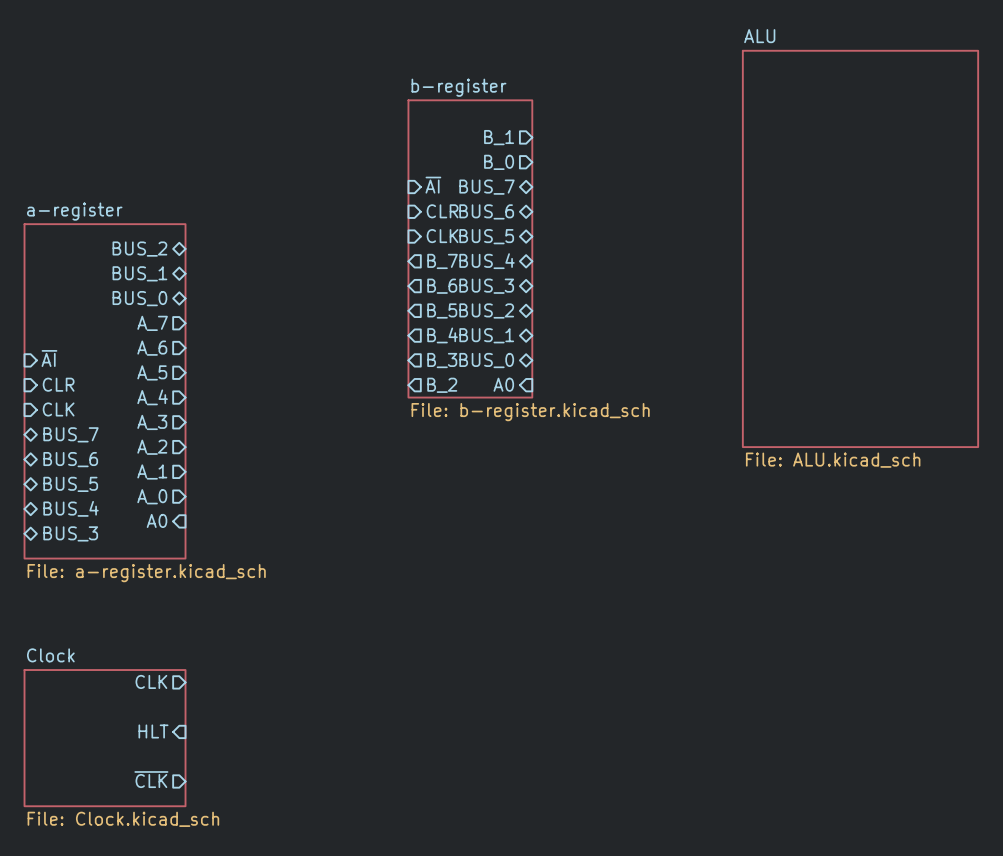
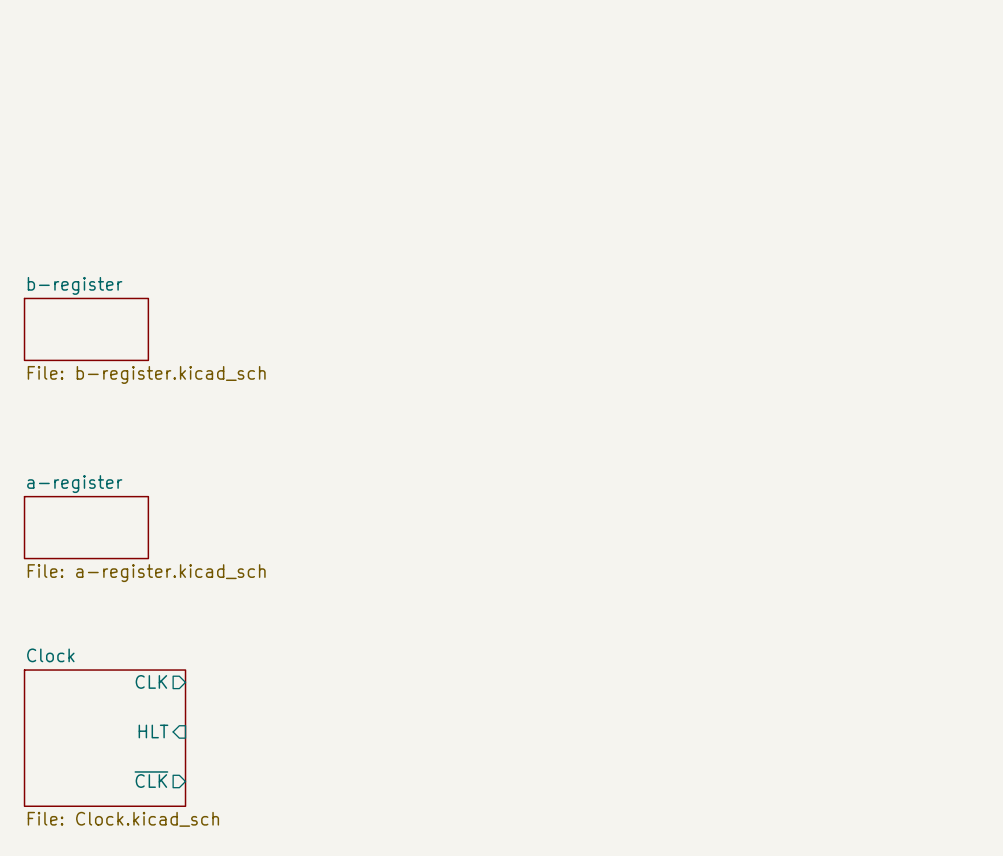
sheet pin: B_1 (499, 137) -> none
sheet pin: B_0 (499, 162) -> none
sheet pin: ~{AI} (433, 185) -> none
sheet pin: BUS_7 (486, 187) -> none
sheet pin: CLR (442, 211) -> none
sheet pin: BUS_6 (486, 211) -> none
sheet pin: CLK (442, 236) -> none
sheet pin: BUS_5 (486, 236) -> none
sheet b-register: File: b-register.kicad_sch (470, 248) -> none
sheet ALU: File: ALU.kicad_sch (860, 248) -> none
sheet pin: BUS_2 (139, 249) -> none
sheet pin: B_7 (442, 261) -> none
sheet pin: BUS_4 (486, 261) -> none
sheet pin: BUS_1 (139, 273) -> none
sheet pin: B_6 (442, 286) -> none
sheet pin: BUS_3 (486, 286) -> none
sheet pin: BUS_0 (139, 298) -> none
sheet pin: B_5 (442, 310) -> none
sheet pin: BUS_2 (486, 310) -> none
sheet pin: A_7 (152, 323) -> none
sheet b-register: none -> File: b-register.kicad_sch (86, 329)
sheet pin: B_4 (442, 335) -> none
sheet pin: BUS_1 (486, 335) -> none
sheet pin: A_6 (152, 348) -> none
sheet pin: ~{AI} (49, 358) -> none
sheet pin: B_3 (442, 360) -> none
sheet pin: BUS_0 (486, 360) -> none
sheet pin: A_5 (152, 372) -> none
sheet pin: CLR (58, 384) -> none
sheet pin: A0 (503, 384) -> none
sheet pin: B_2 (442, 385) -> none
sheet a-register: File: a-register.kicad_sch (105, 391) -> none
sheet pin: A_4 (152, 397) -> none
sheet pin: CLK (58, 409) -> none
sheet pin: A_3 (152, 422) -> none
sheet pin: BUS_7 (71, 434) -> none
sheet pin: A_2 (152, 447) -> none
sheet pin: BUS_6 (70, 459) -> none
sheet pin: A_1 (152, 471) -> none
sheet pin: BUS_5 (70, 484) -> none
sheet pin: A_0 (152, 496) -> none
sheet pin: BUS_4 (71, 508) -> none
sheet pin: A0 (157, 520) -> none
sheet a-register: none -> File: a-register.kicad_sch (86, 527)
sheet pin: BUS_3 (70, 533) -> none

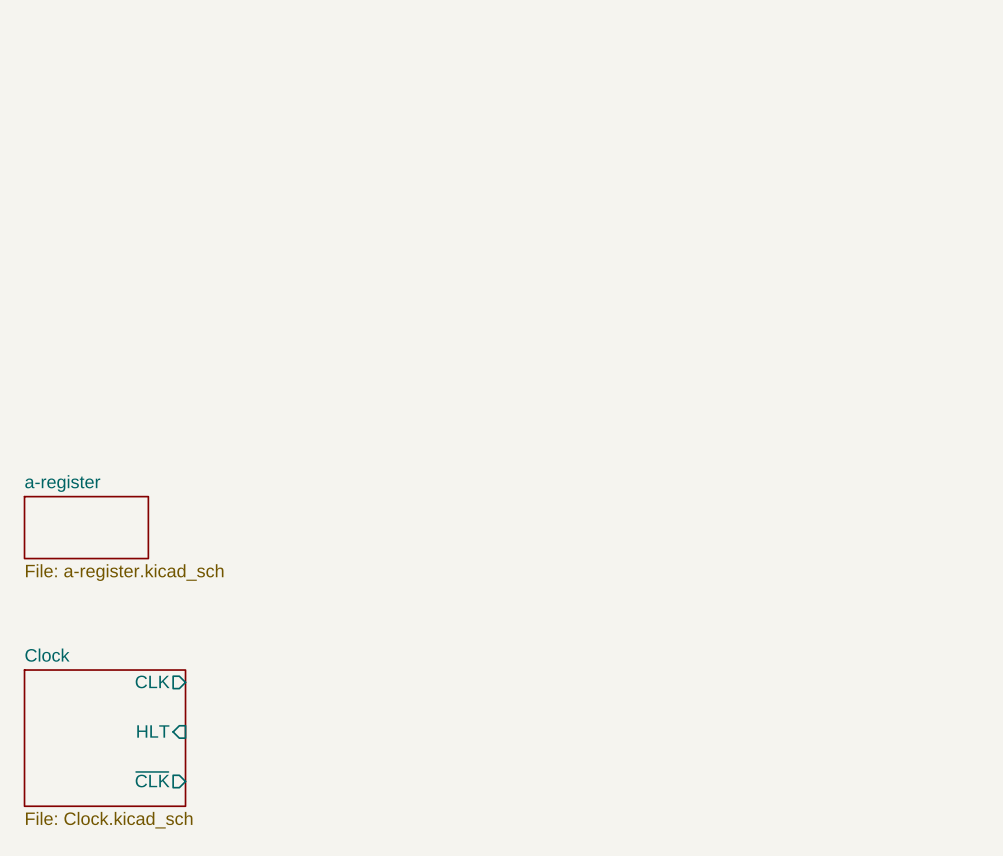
sheet b-register: File: b-register.kicad_sch (86, 329) -> none

